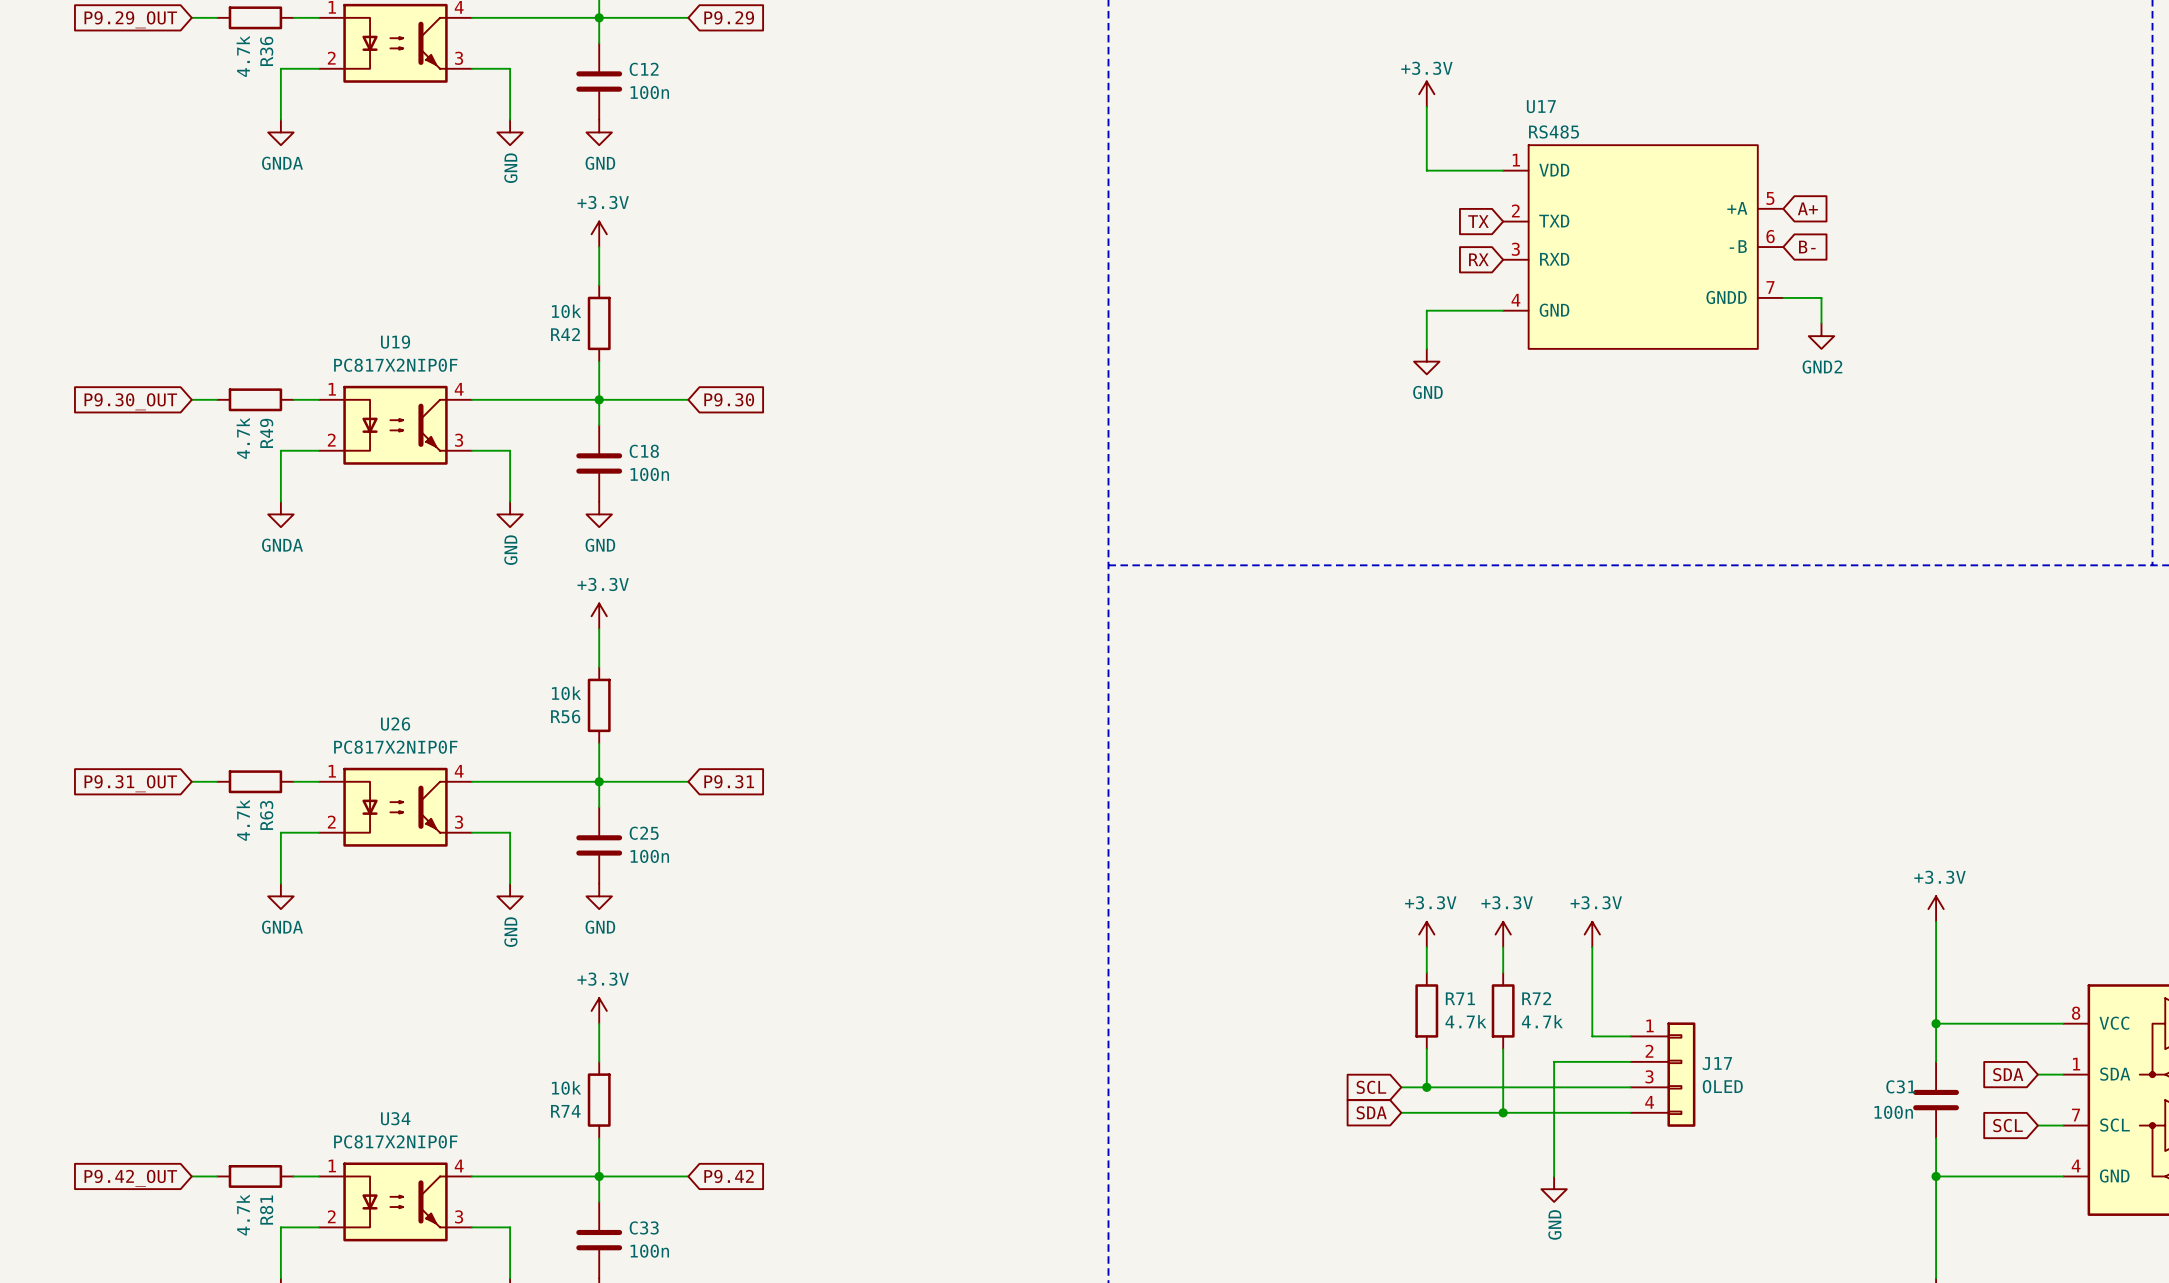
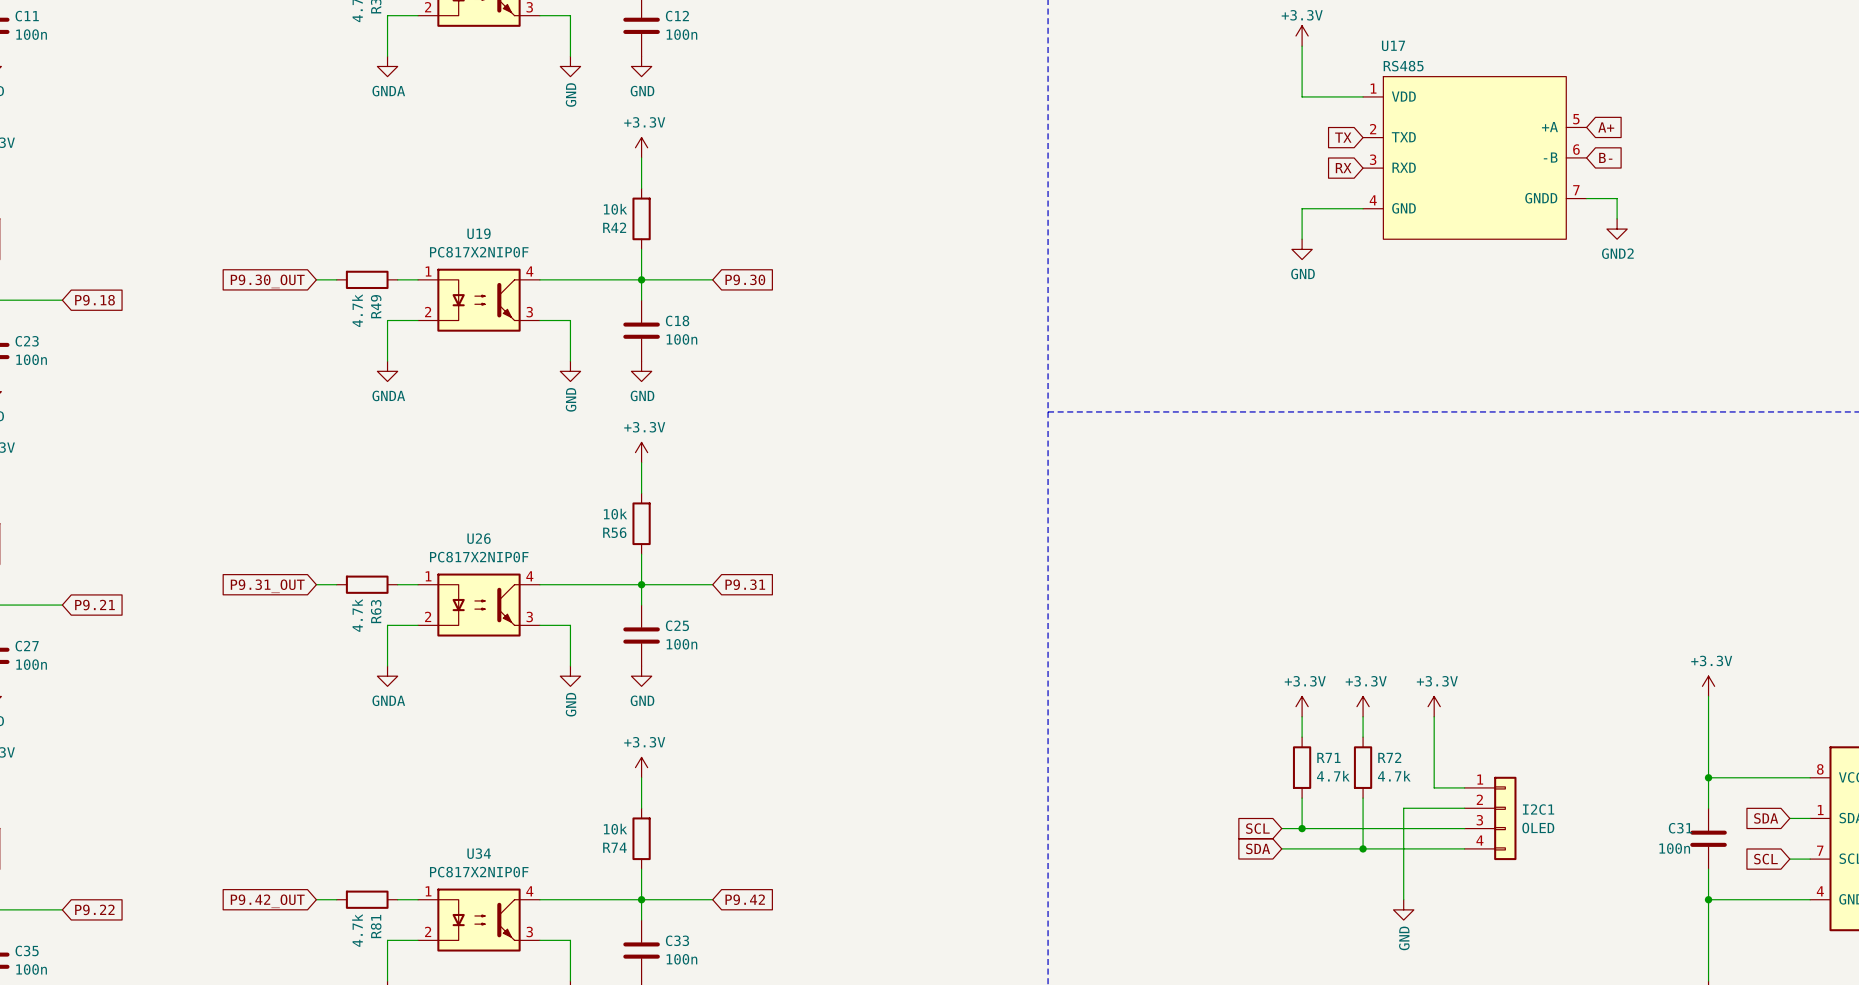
J17 name: J17 (1717, 1063) -> I2C1 (1538, 809)

